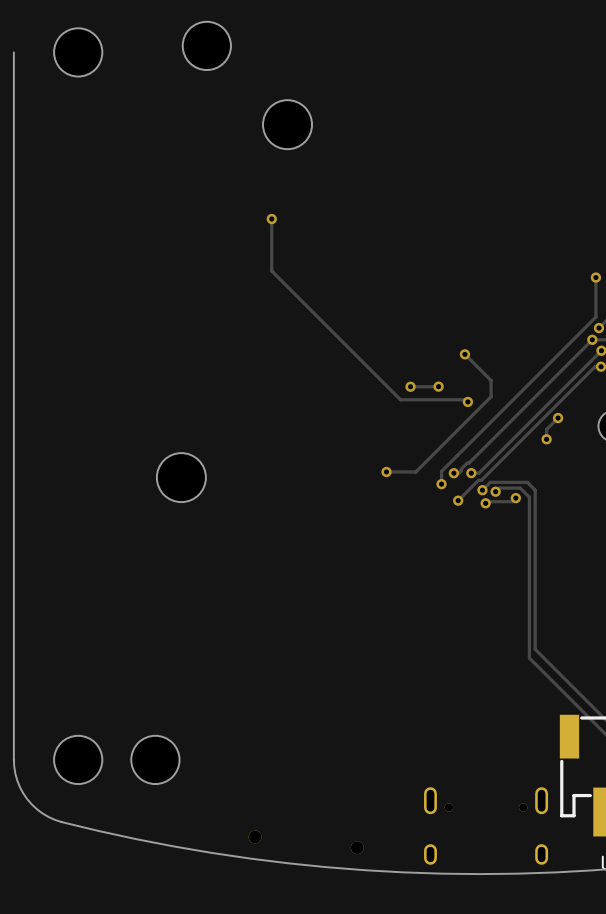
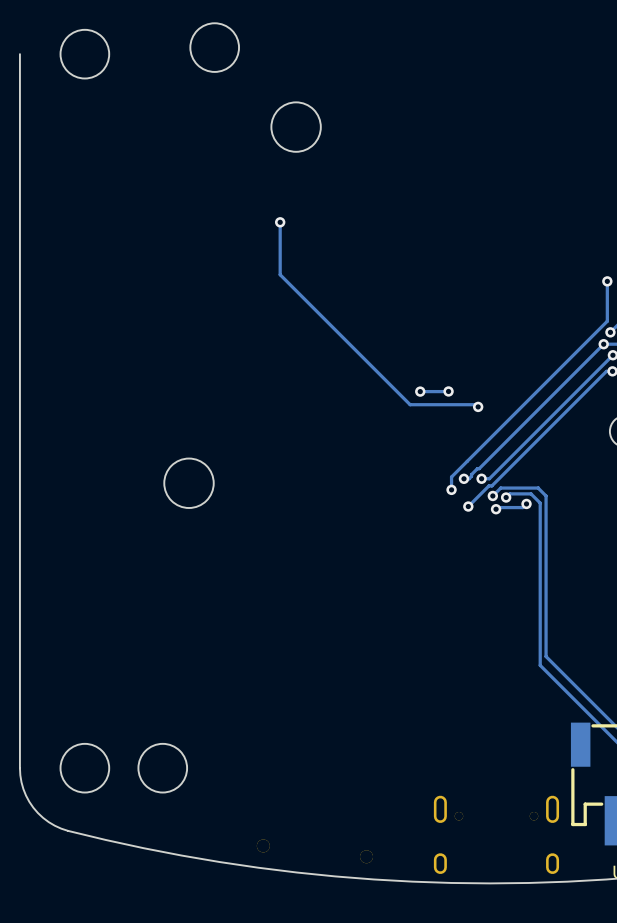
track: (464, 354) (491, 380) (491, 396) (415, 471) (386, 471) -> none
via: (464, 354) -> none
track: (558, 418) (546, 429) (546, 439) -> none
via: (558, 418) -> none
via: (546, 439) -> none
via: (386, 471) -> none

